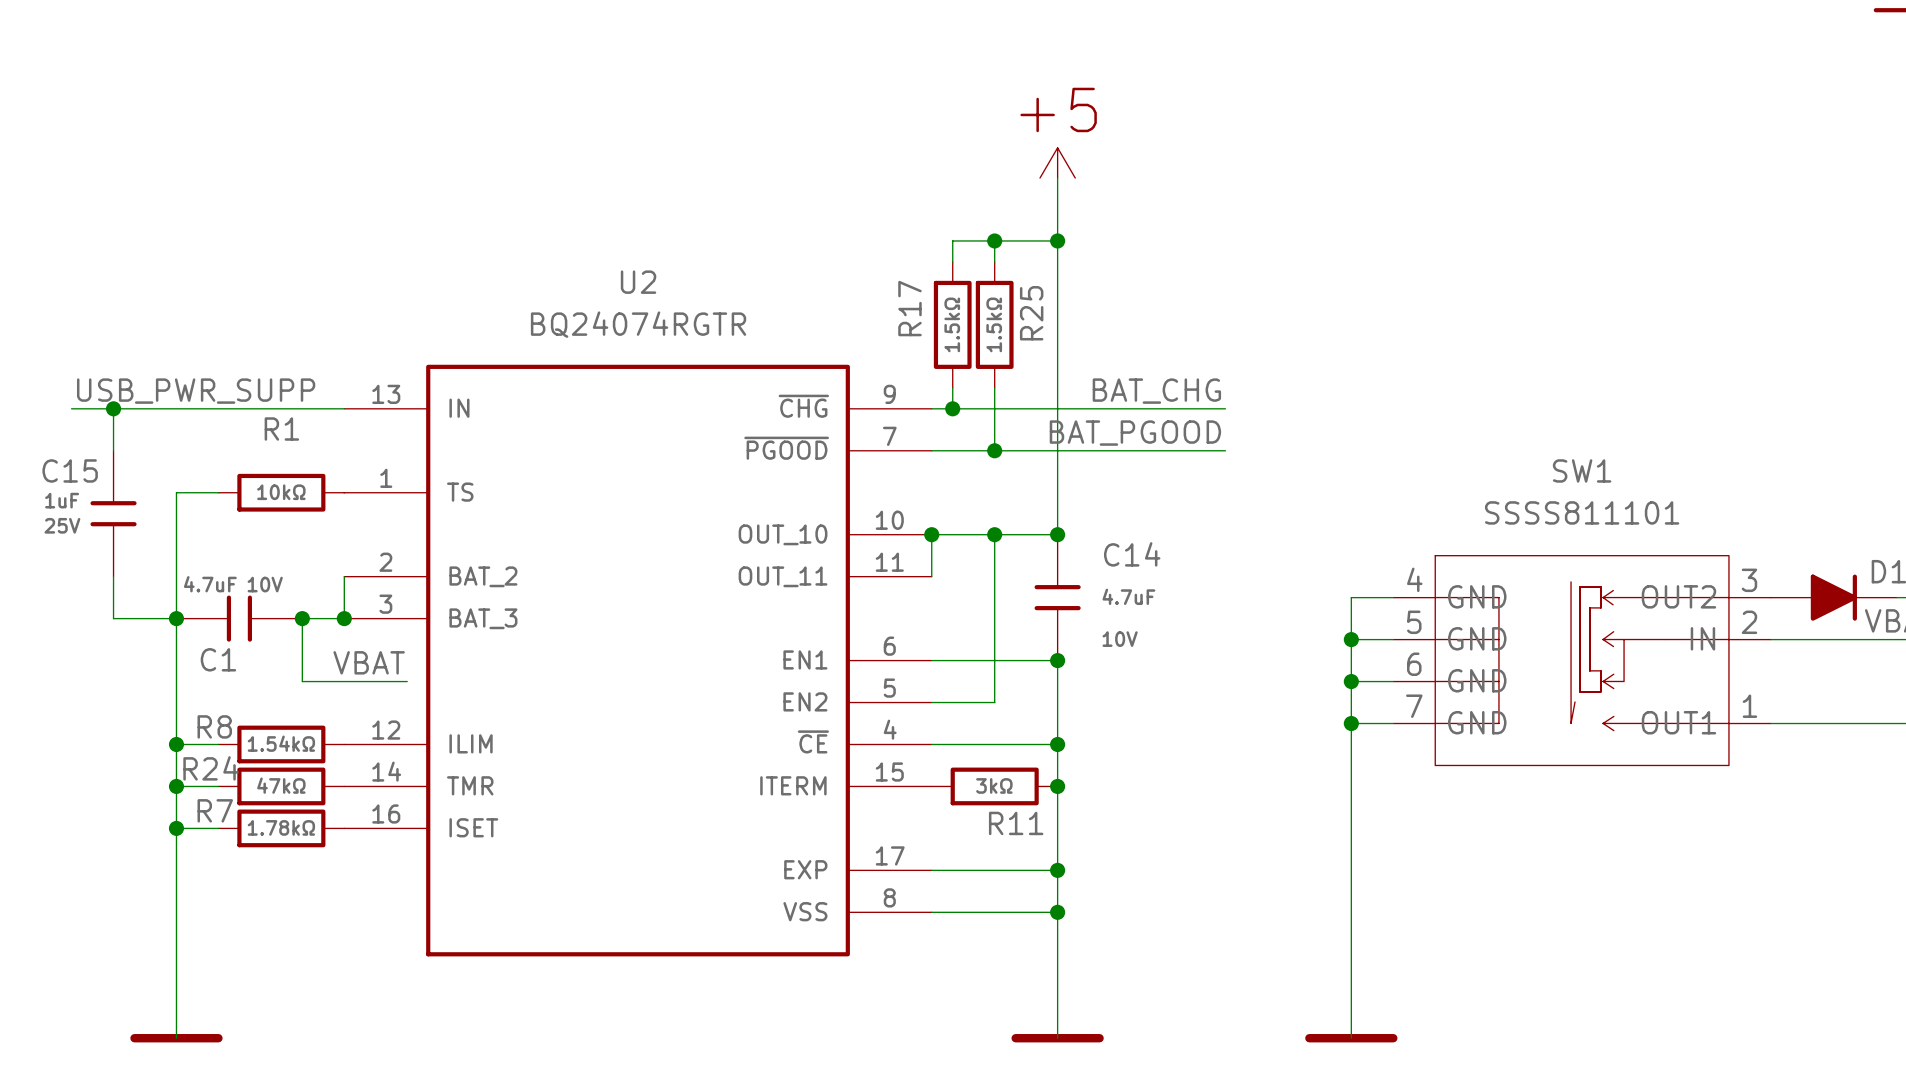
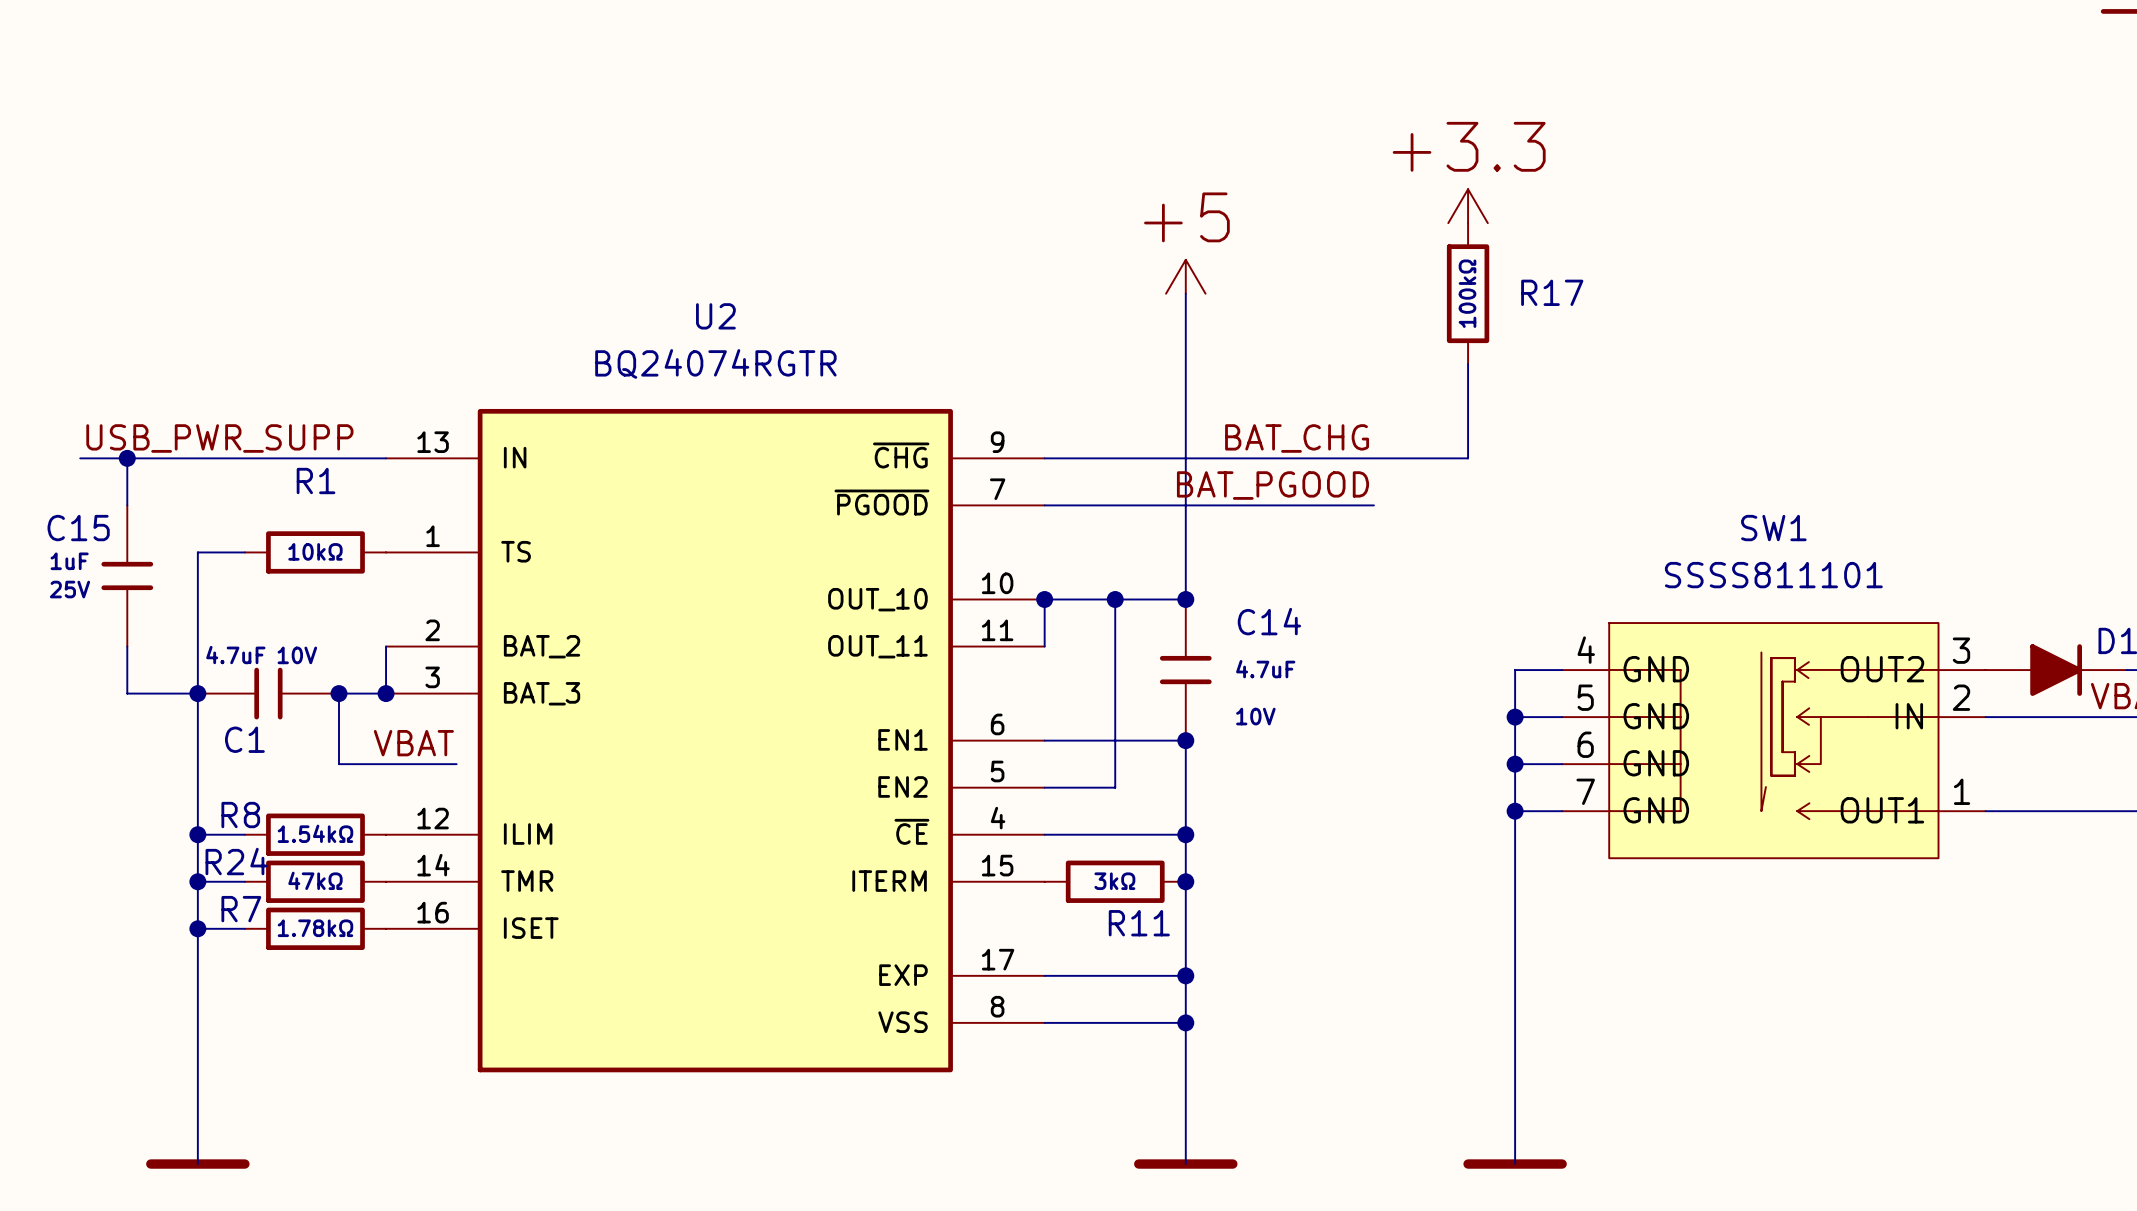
power symbol position: (1057, 162) -> (1185, 276)
wire: (1057, 178) (1057, 261) -> none
power symbol: none -> (1468, 206)
wire: (994, 240) (994, 261) -> none
junction: (994, 240) -> none
wire: (1057, 240) (952, 240) (952, 261) -> none
junction: (1057, 240) -> none
R17 name rotation: 0° (909, 308) -> 90° clockwise (1552, 292)
R17 name position: R17 (909, 308) -> R17 (1552, 292)
R17 position: (952, 324) -> (1468, 293)
R17 value: 1.5kΩ (952, 324) -> 100kΩ (1467, 293)
R25: 1.5kΩ (994, 324) -> none
wire: none -> (1468, 364) (1468, 458) (1373, 458)
wire: (952, 387) (952, 408) -> none
wire: (994, 387) (994, 450) -> none
junction: (952, 408) -> none
junction: (994, 450) -> none

